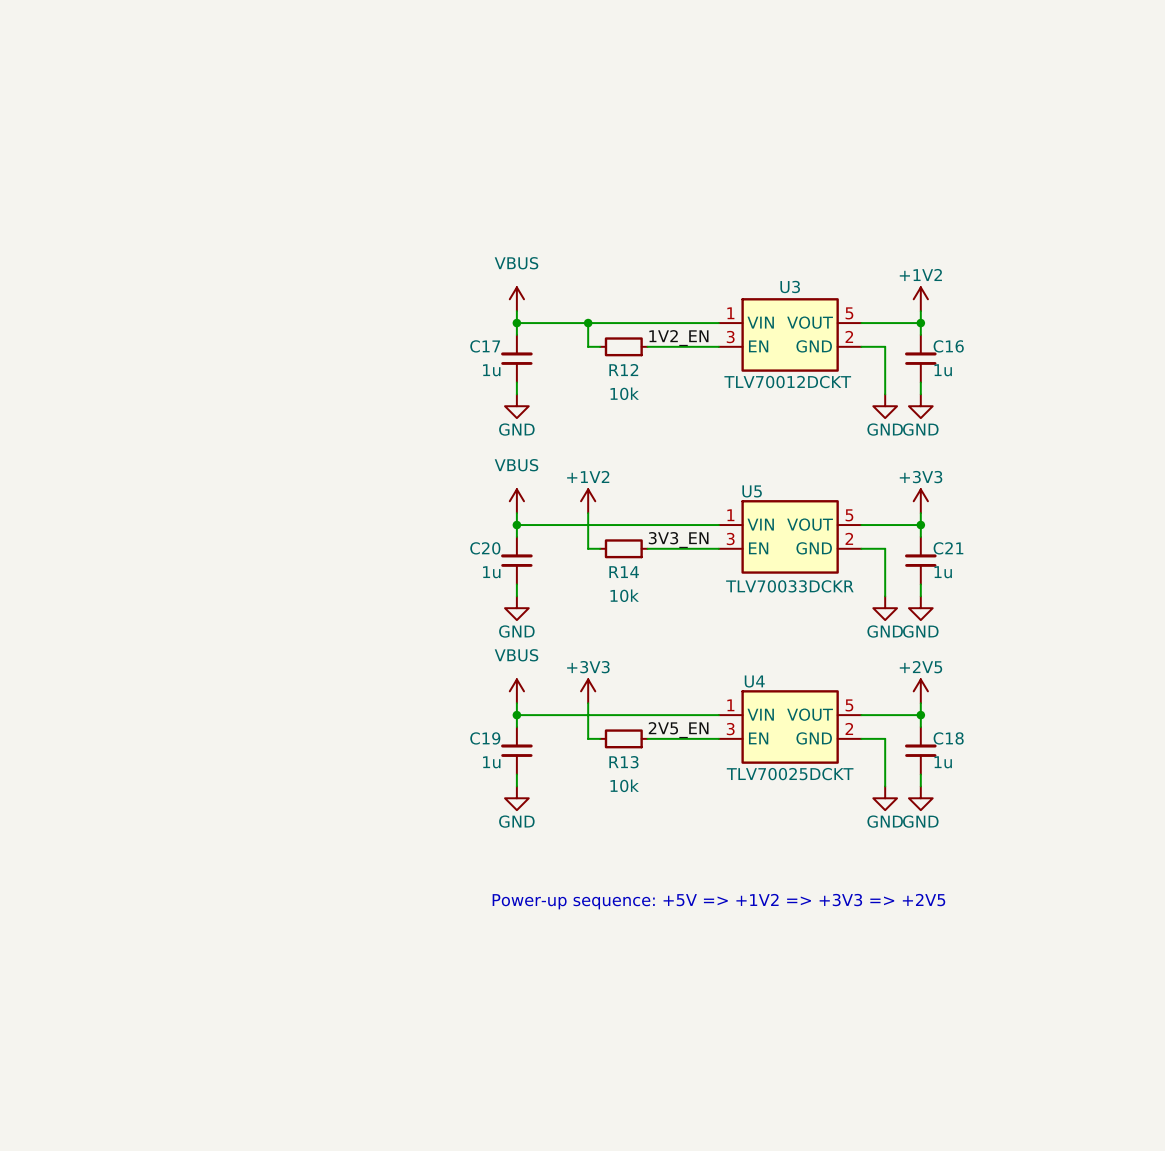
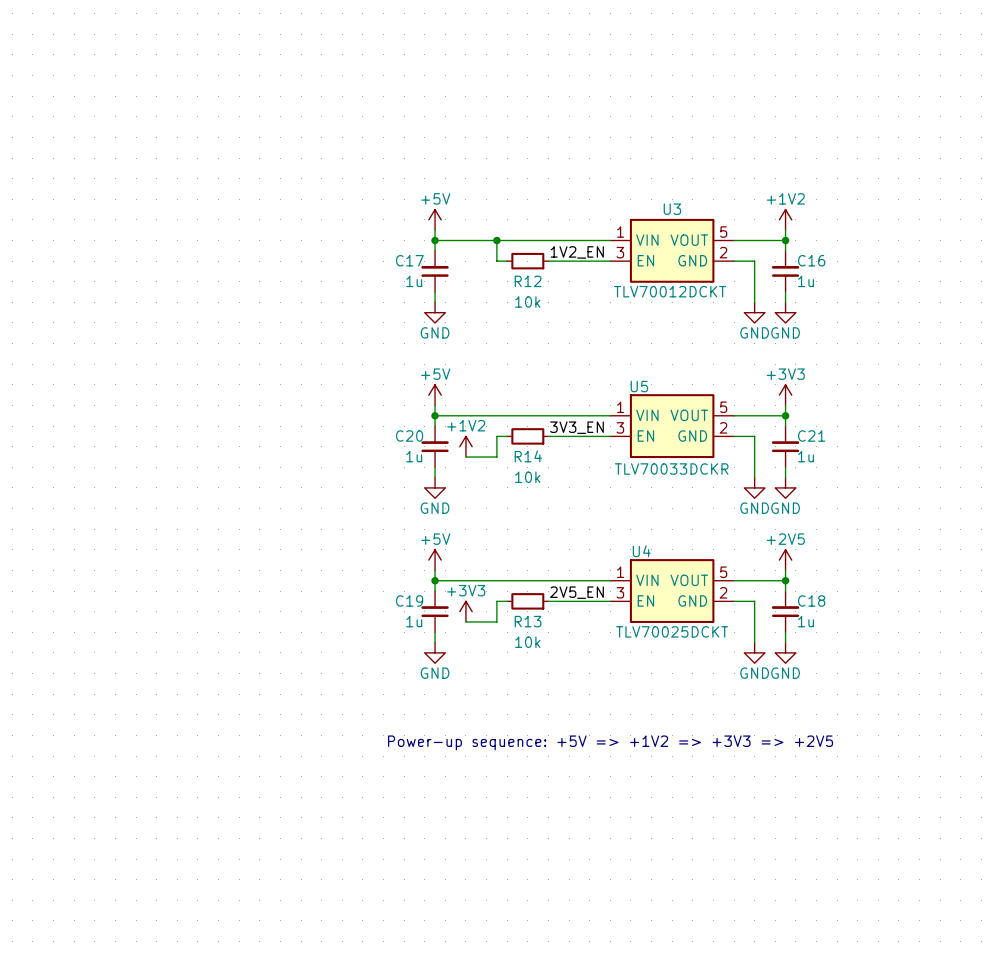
power symbol: VBUS (516, 299) -> +5V (435, 219)
power symbol: VBUS (516, 501) -> +5V (435, 395)
power symbol position: +1V2 (588, 501) -> +1V2 (465, 446)
wire: (588, 513) (588, 548) -> (465, 457) (496, 457) (496, 436)
power symbol: VBUS (516, 691) -> +5V (435, 560)
power symbol position: +3V3 (588, 691) -> +3V3 (465, 611)
wire: (588, 703) (588, 738) -> (465, 621) (496, 621) (496, 601)

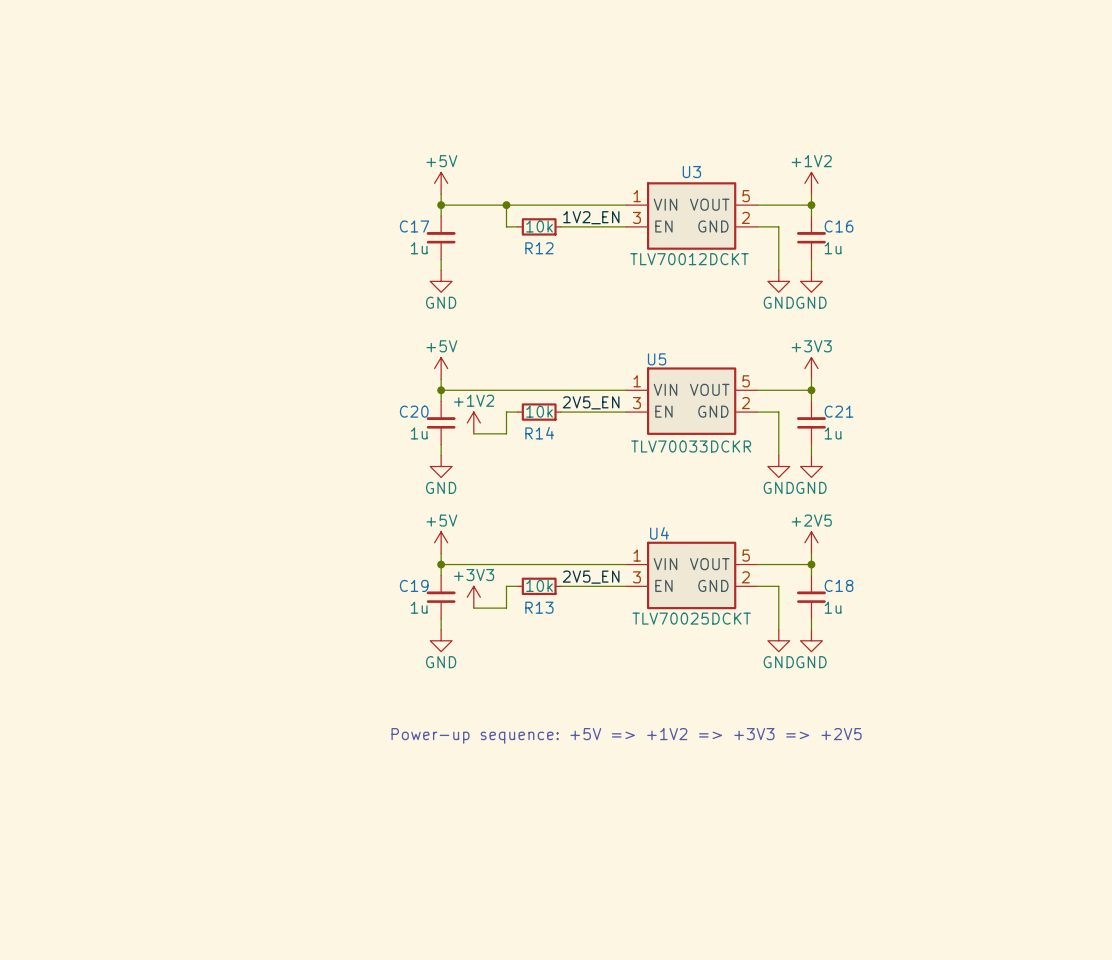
R12 text position: 10k (527, 301) -> 10k (539, 226)
label: 3V3_EN (576, 427) -> 2V5_EN (591, 402)
R14 text position: 10k (527, 477) -> 10k (539, 411)
R13 text position: 10k (527, 642) -> 10k (539, 585)

